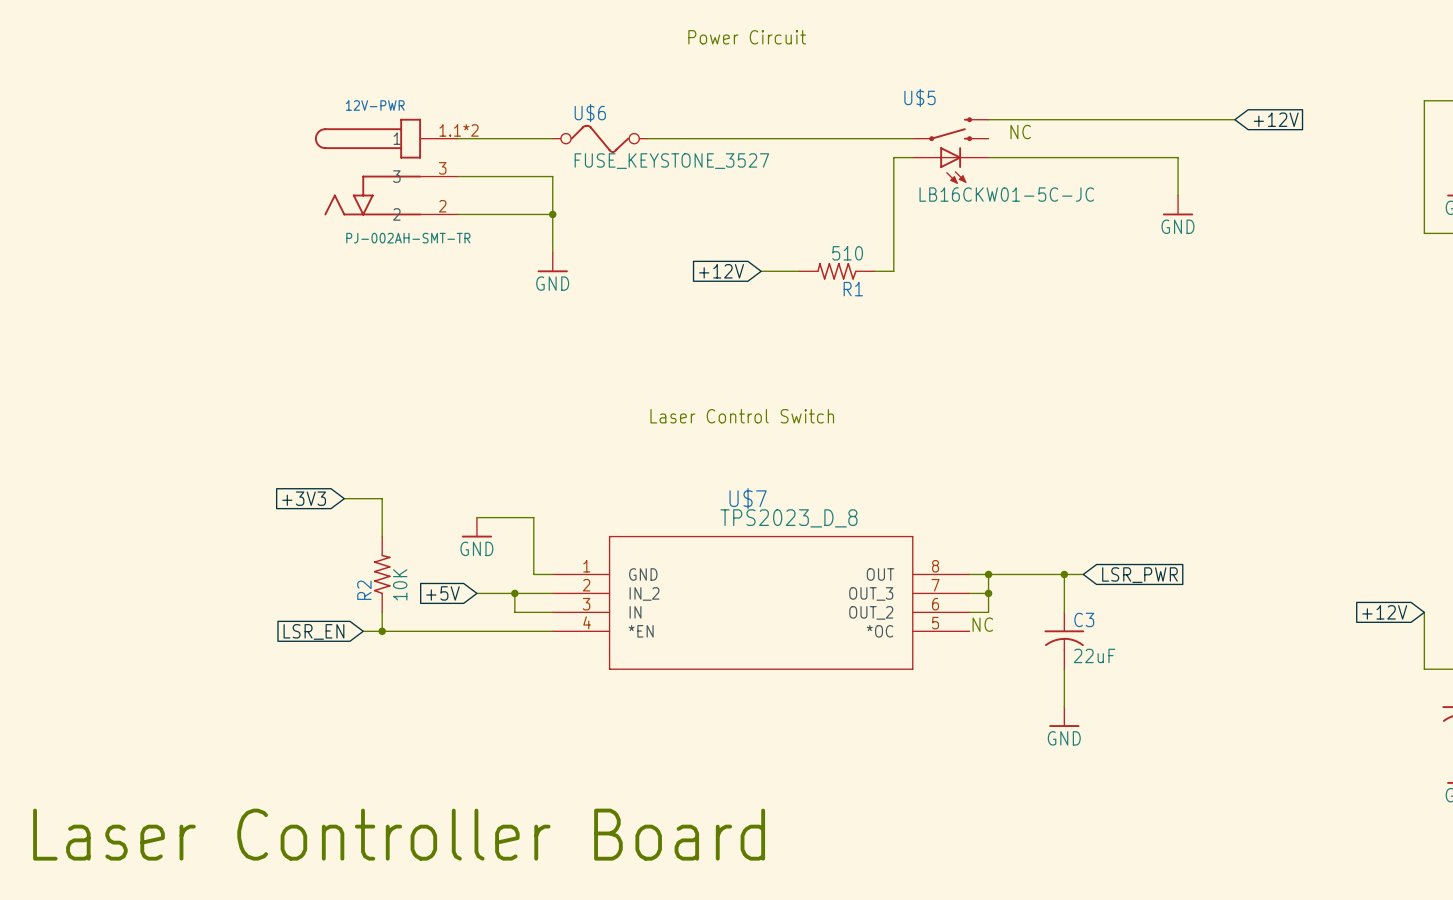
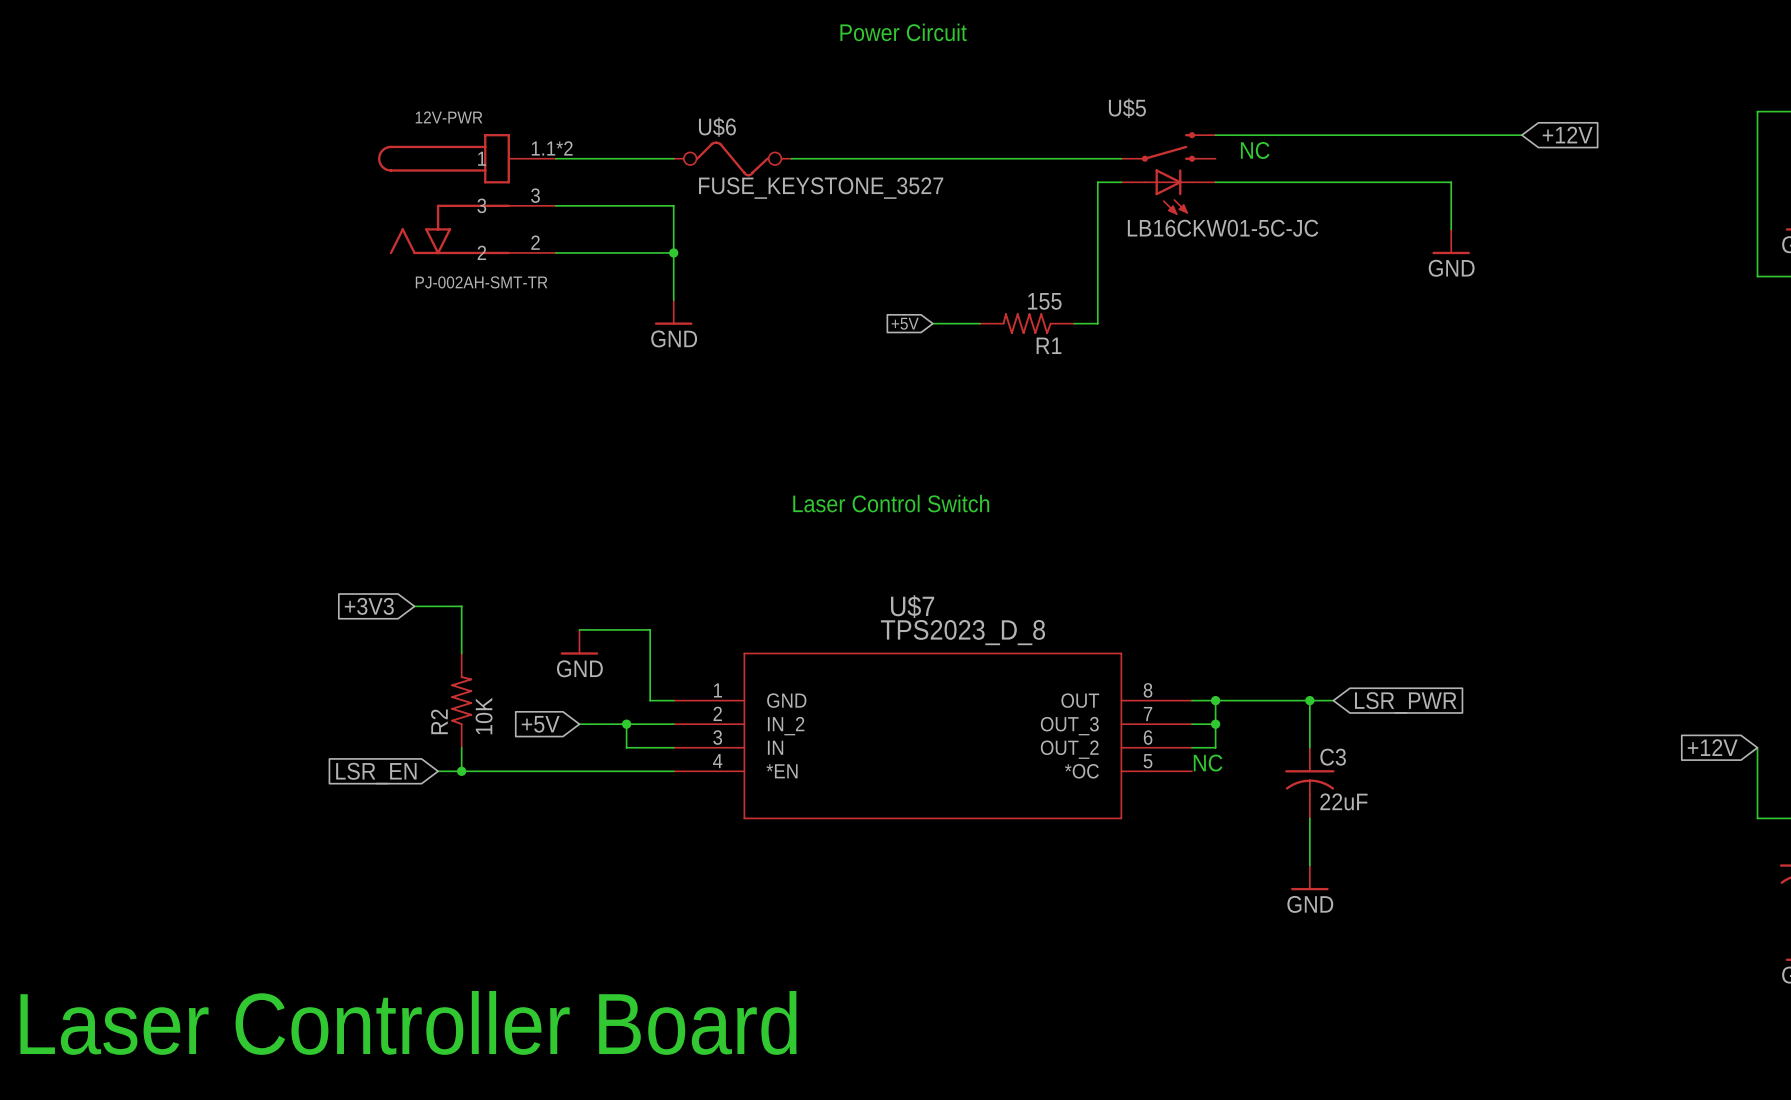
R1 value: 510 (847, 253) -> 155 (1044, 301)
global label: +12V (721, 271) -> +5V (905, 323)

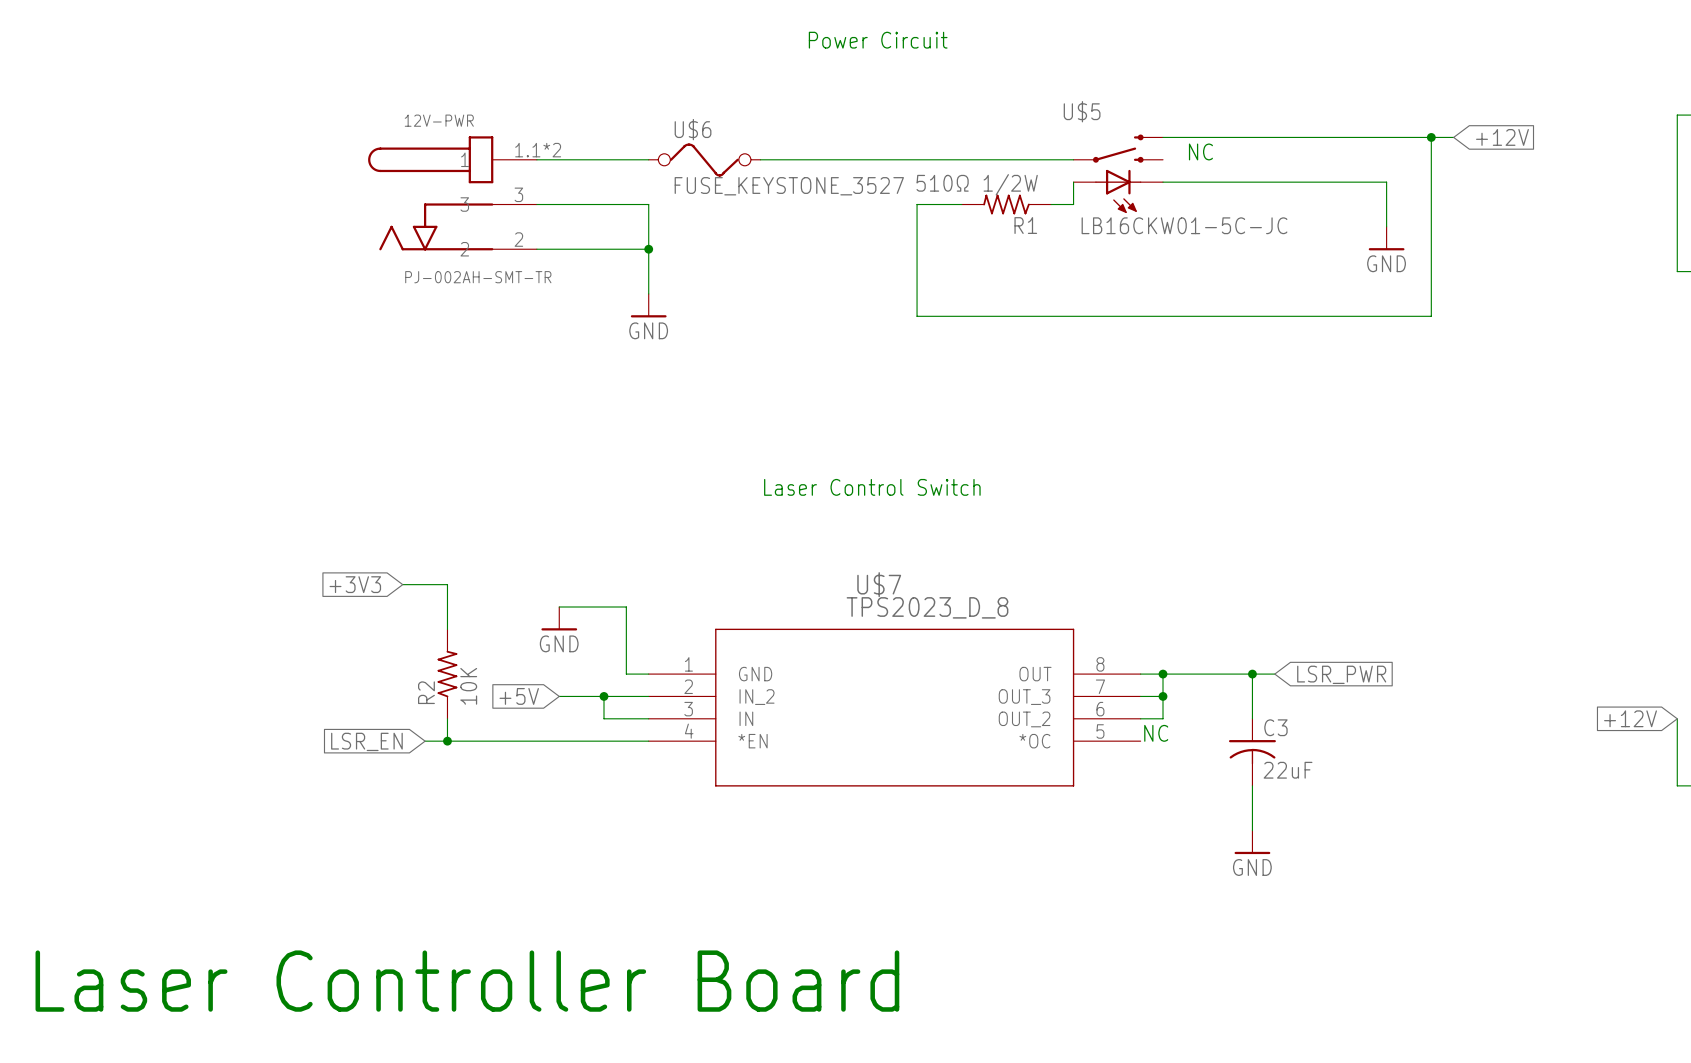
wire: none -> (1431, 137) (1431, 316) (1051, 316)
junction: none -> (1431, 137)
wire: (1121, 182) (1097, 182) (1097, 323) -> (1073, 182) (1073, 204) (1051, 204)
R1 value: 155 (1044, 301) -> 510Ω 1/2W (977, 184)
global label: +5V (905, 323) -> none
wire: (932, 323) (956, 323) -> (961, 204) (917, 204) (917, 316)
R1 position: (1027, 323) -> (1006, 204)

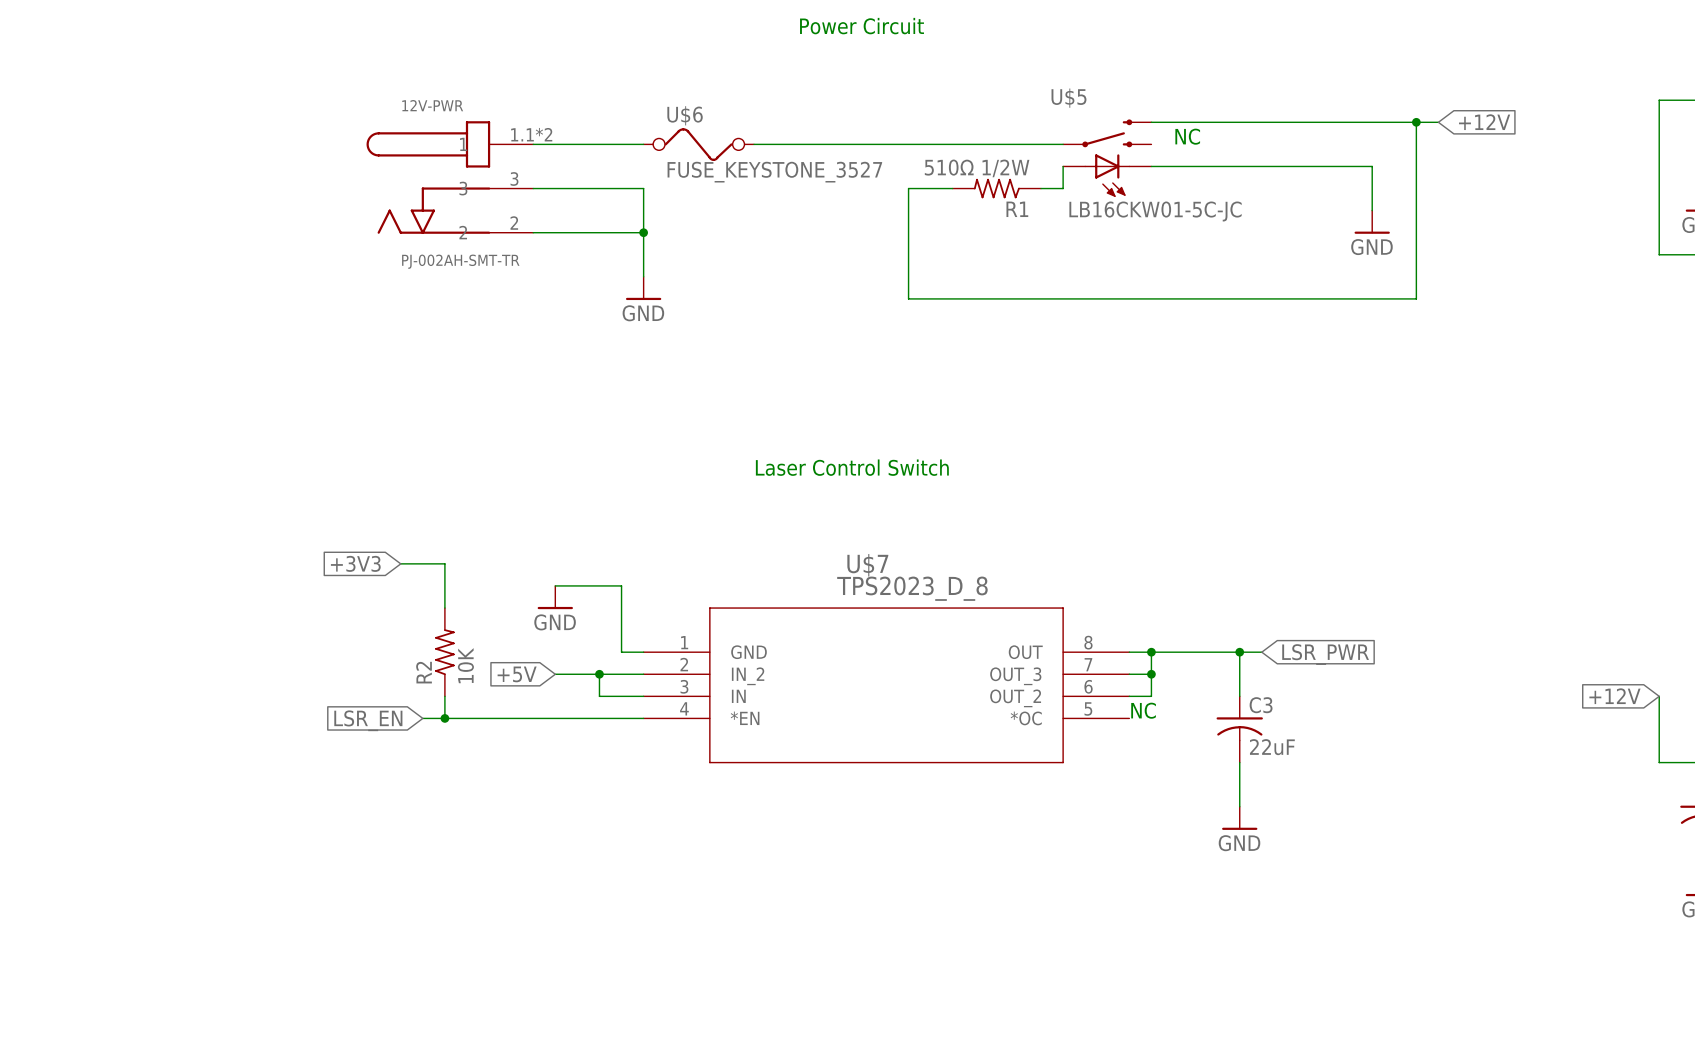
text: Laser Controller Board (467, 981) -> none

